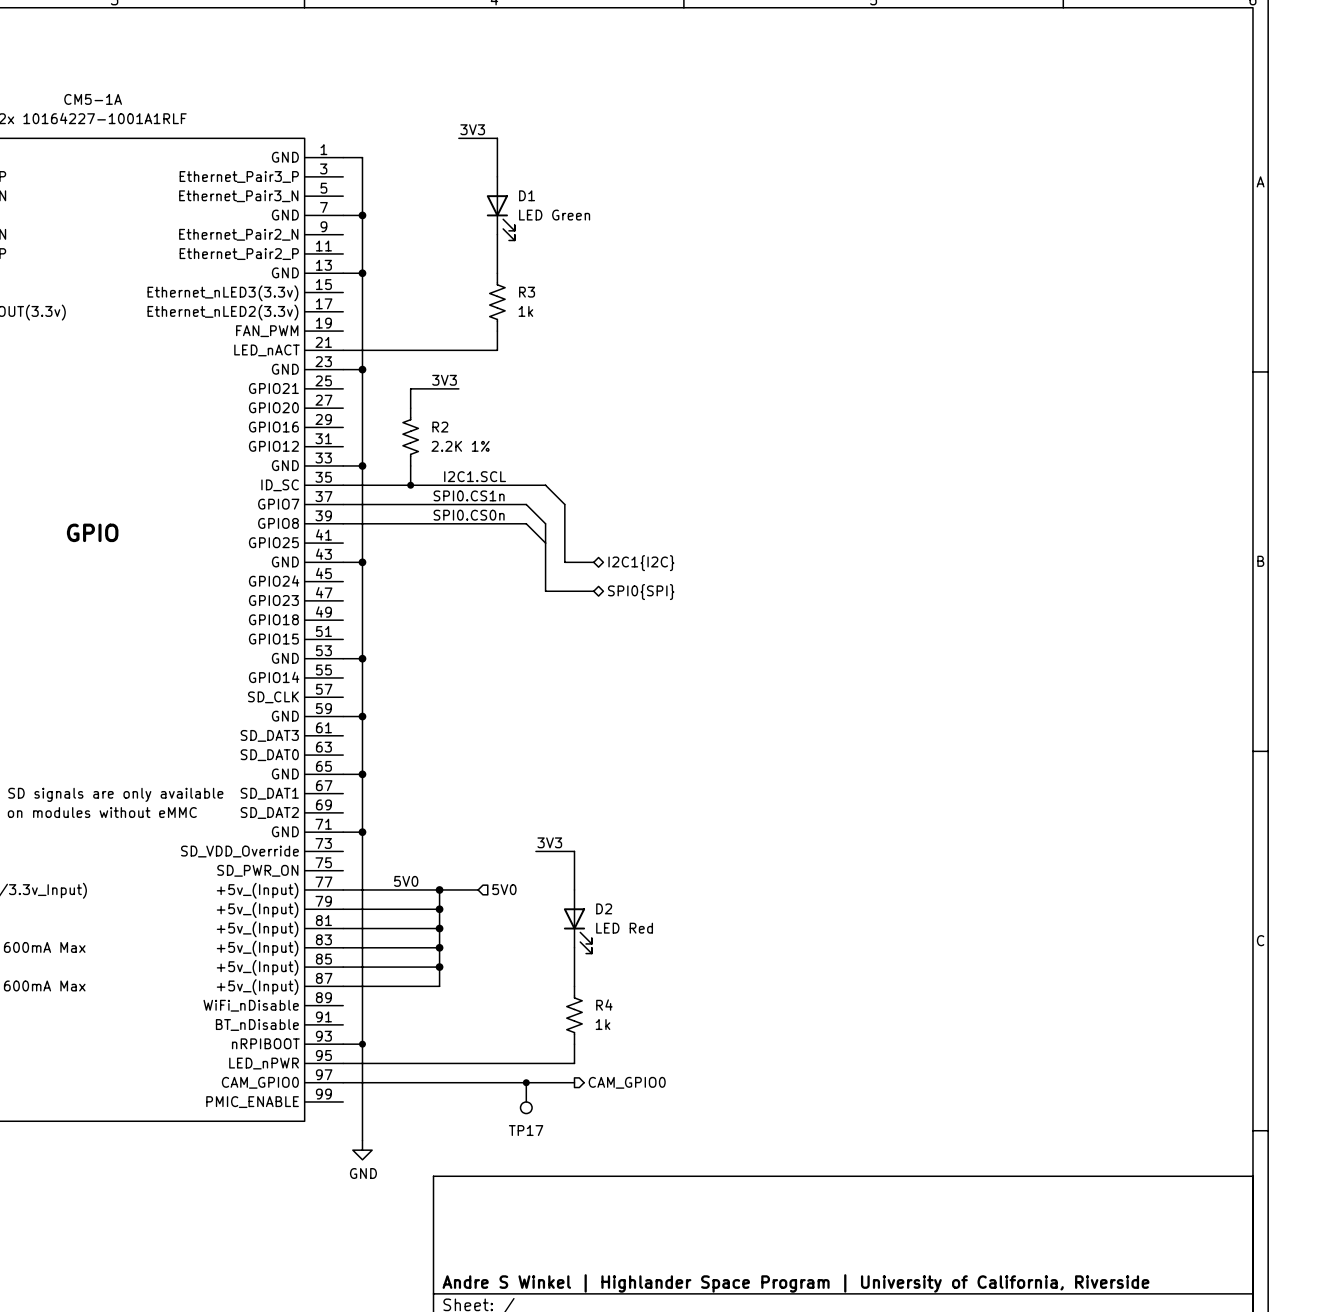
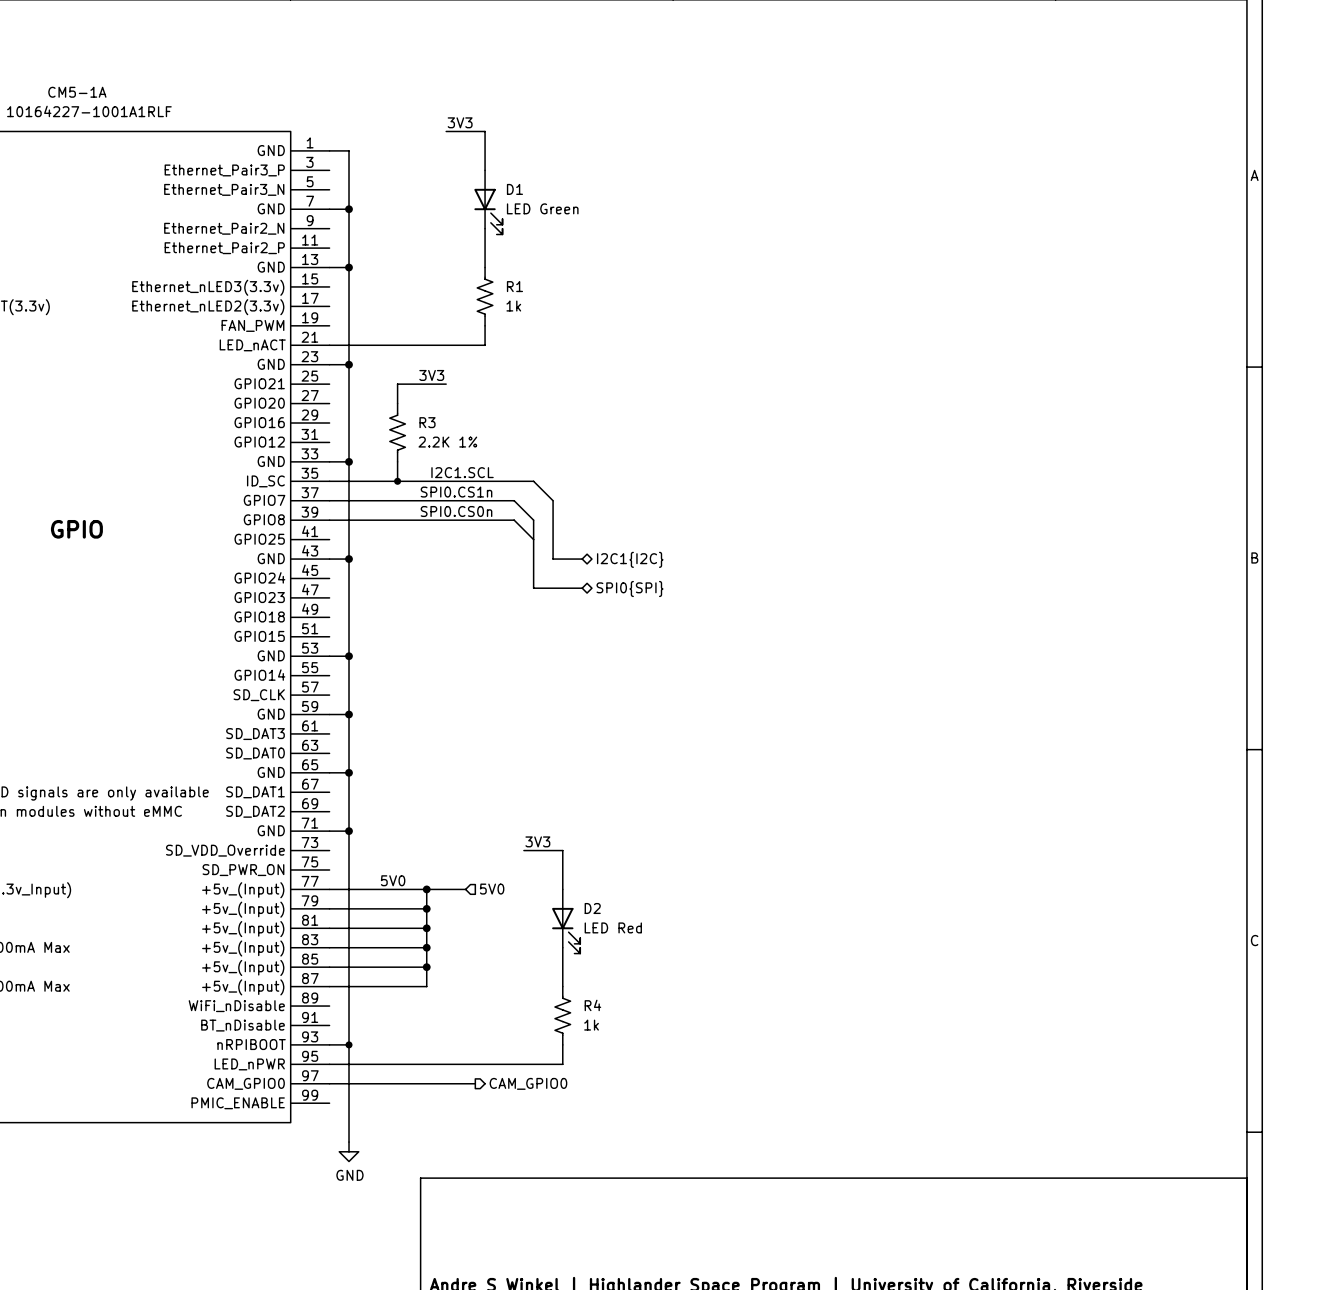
R3 name: R3 (527, 292) -> R1 (514, 286)
R2 name: R2 (440, 427) -> R3 (427, 422)
wire: (487, 1082) (574, 1082) -> none
junction: (526, 1082) -> none
hierarchical label position: CAM_GPIO0 (627, 1082) -> CAM_GPIO0 (528, 1083)
TP17: (526, 1098) -> none

